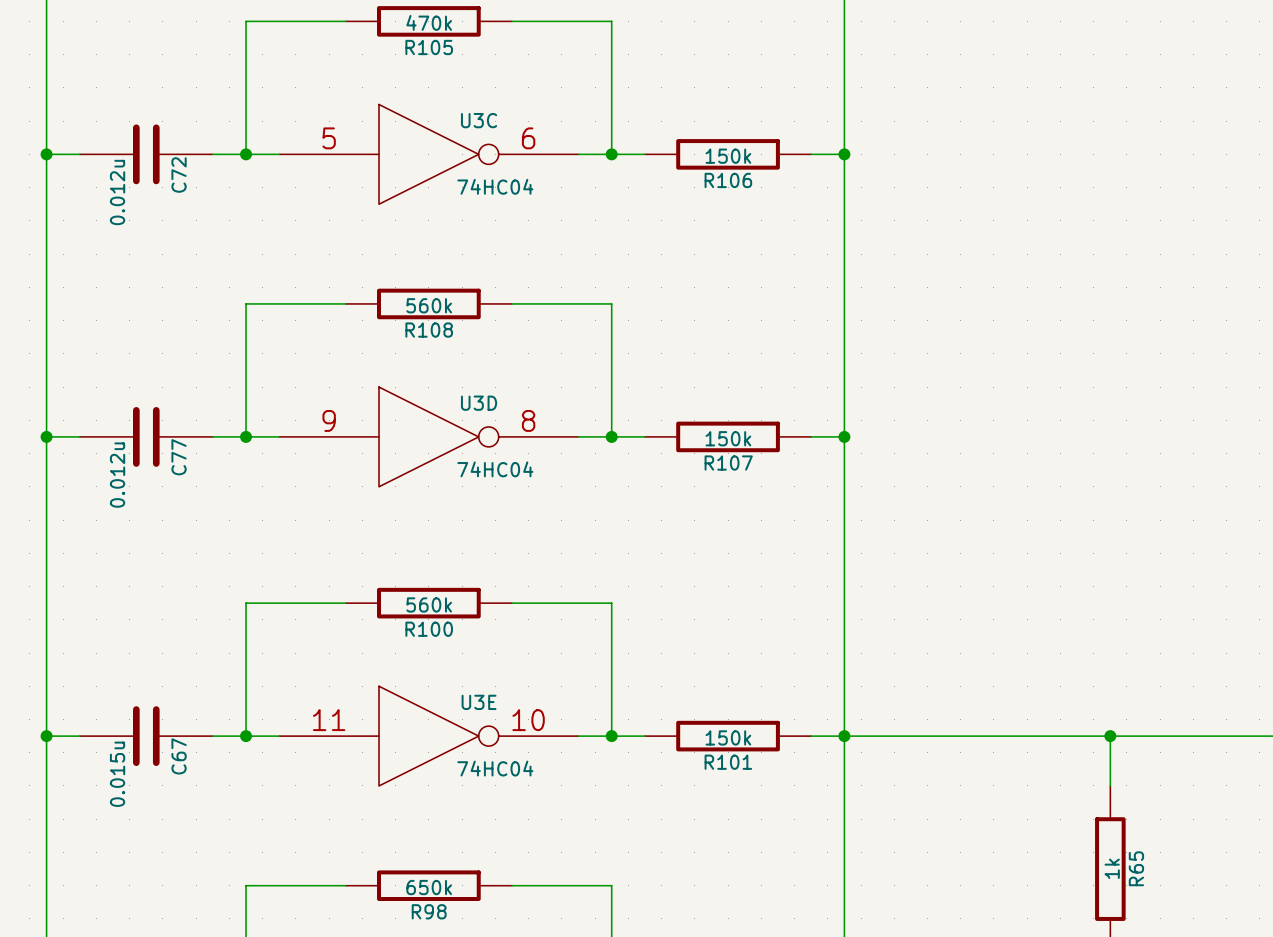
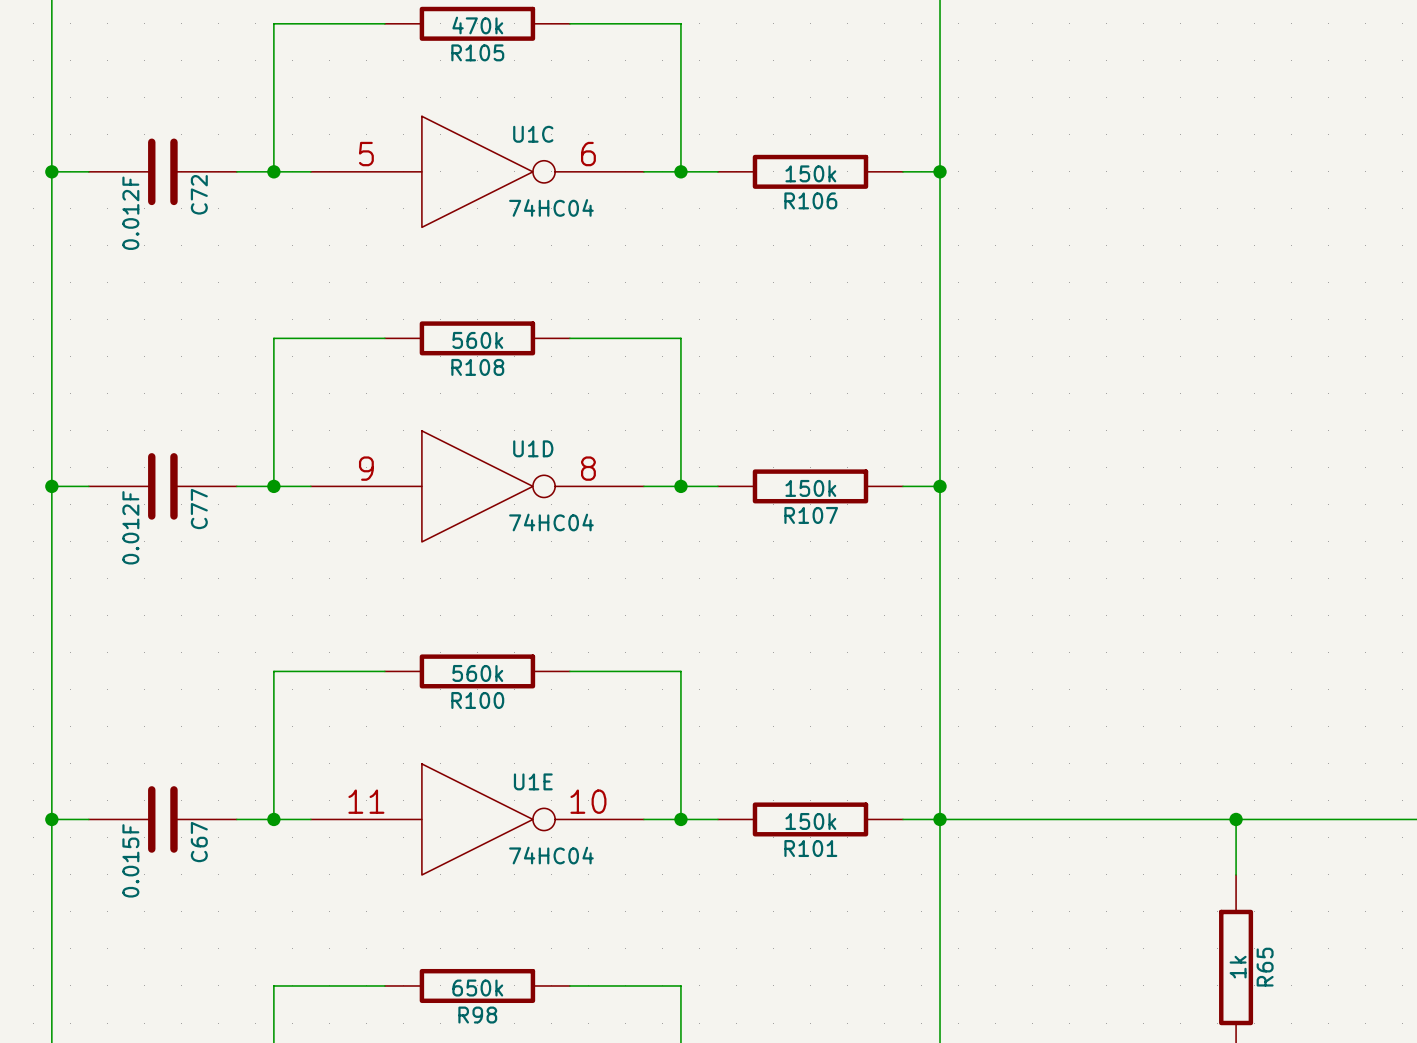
U3C name: U3C (479, 120) -> U1C (533, 134)
C72 value: 0.012u (117, 192) -> 0.012F (130, 213)
U3D name: U3D (479, 403) -> U1D (533, 448)
C77 value: 0.012u (117, 475) -> 0.012F (130, 527)
U3E name: U3E (479, 702) -> U1E (533, 781)
C67 value: 0.015u (117, 774) -> 0.015F (130, 860)

